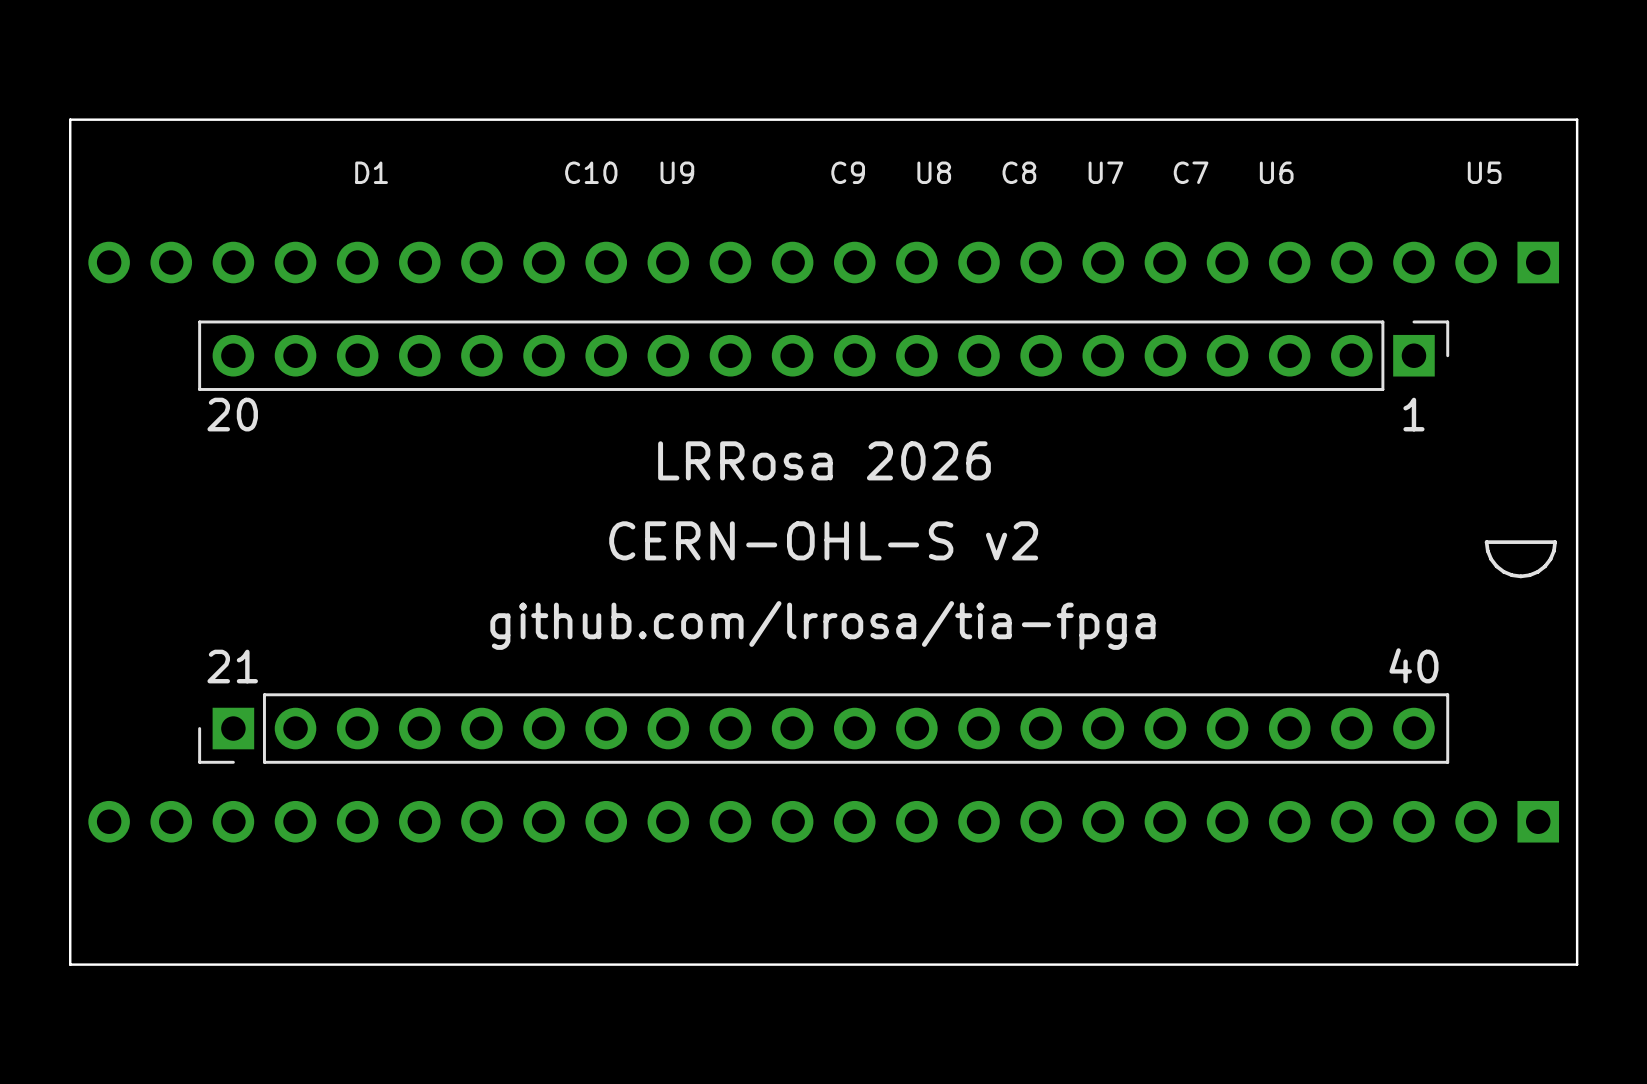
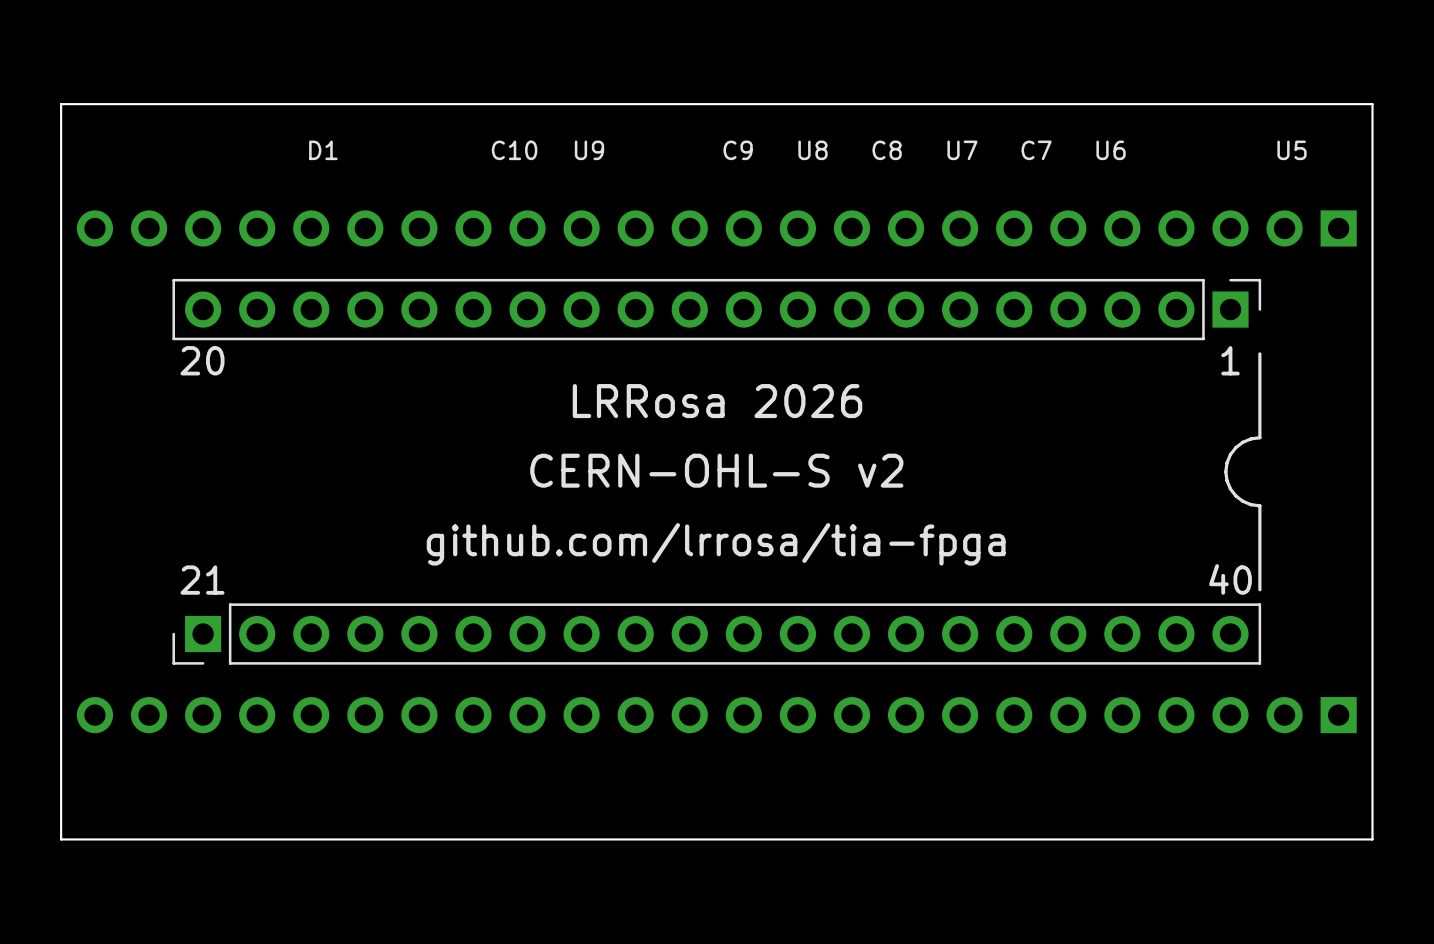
line: none -> (1259, 353) (1259, 437) (1251, 438) (1235, 447) (1230, 454) (1225, 471) (1230, 488) (1235, 495) (1242, 501) (1259, 505) (1259, 589)
line: (1555, 542) (1550, 559) (1545, 566) (1529, 575) (1520, 576) (1512, 575) (1496, 566) (1487, 551) (1486, 542) (1555, 542) -> none

